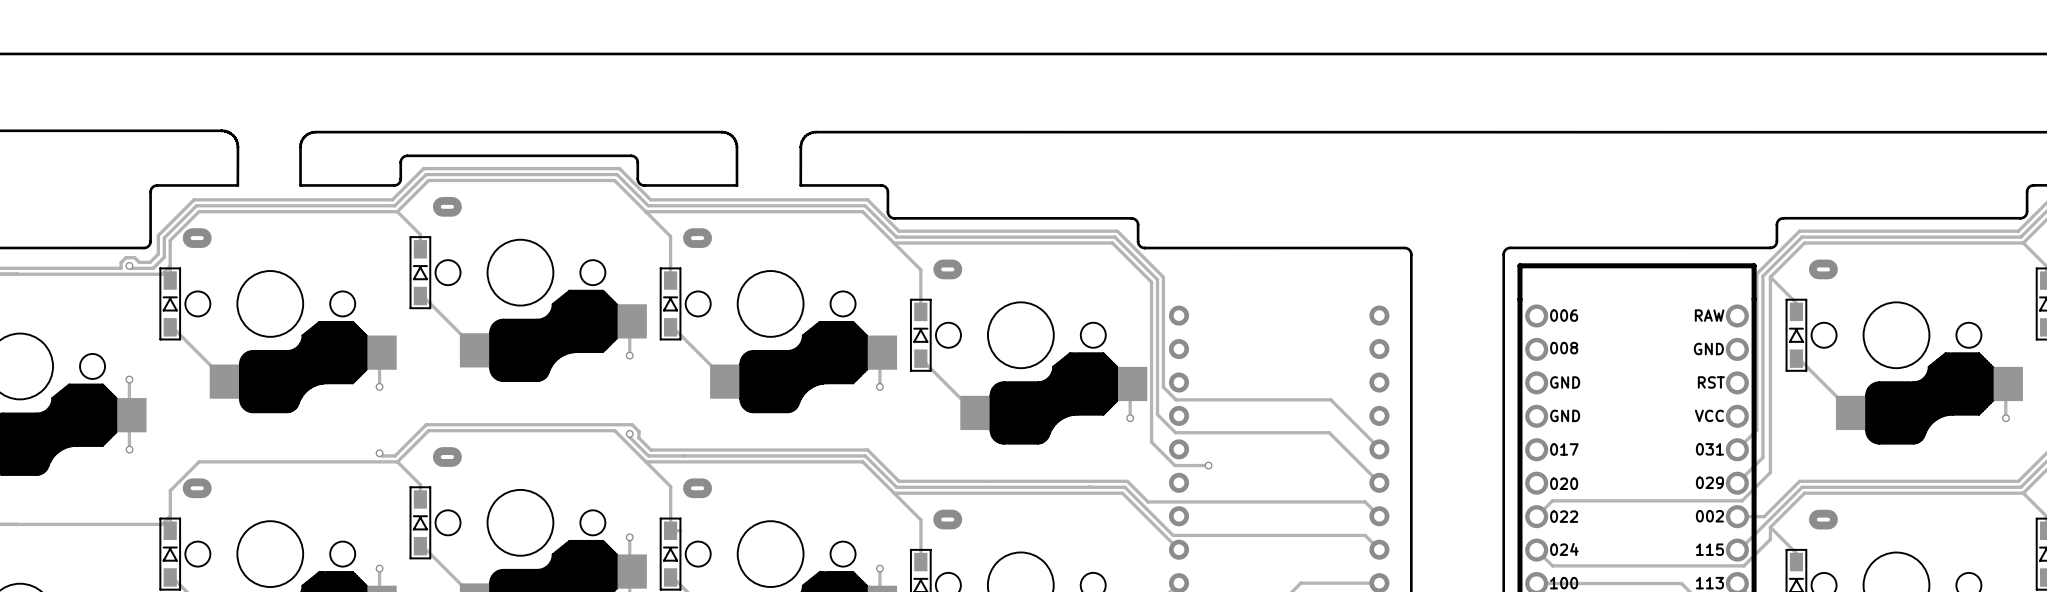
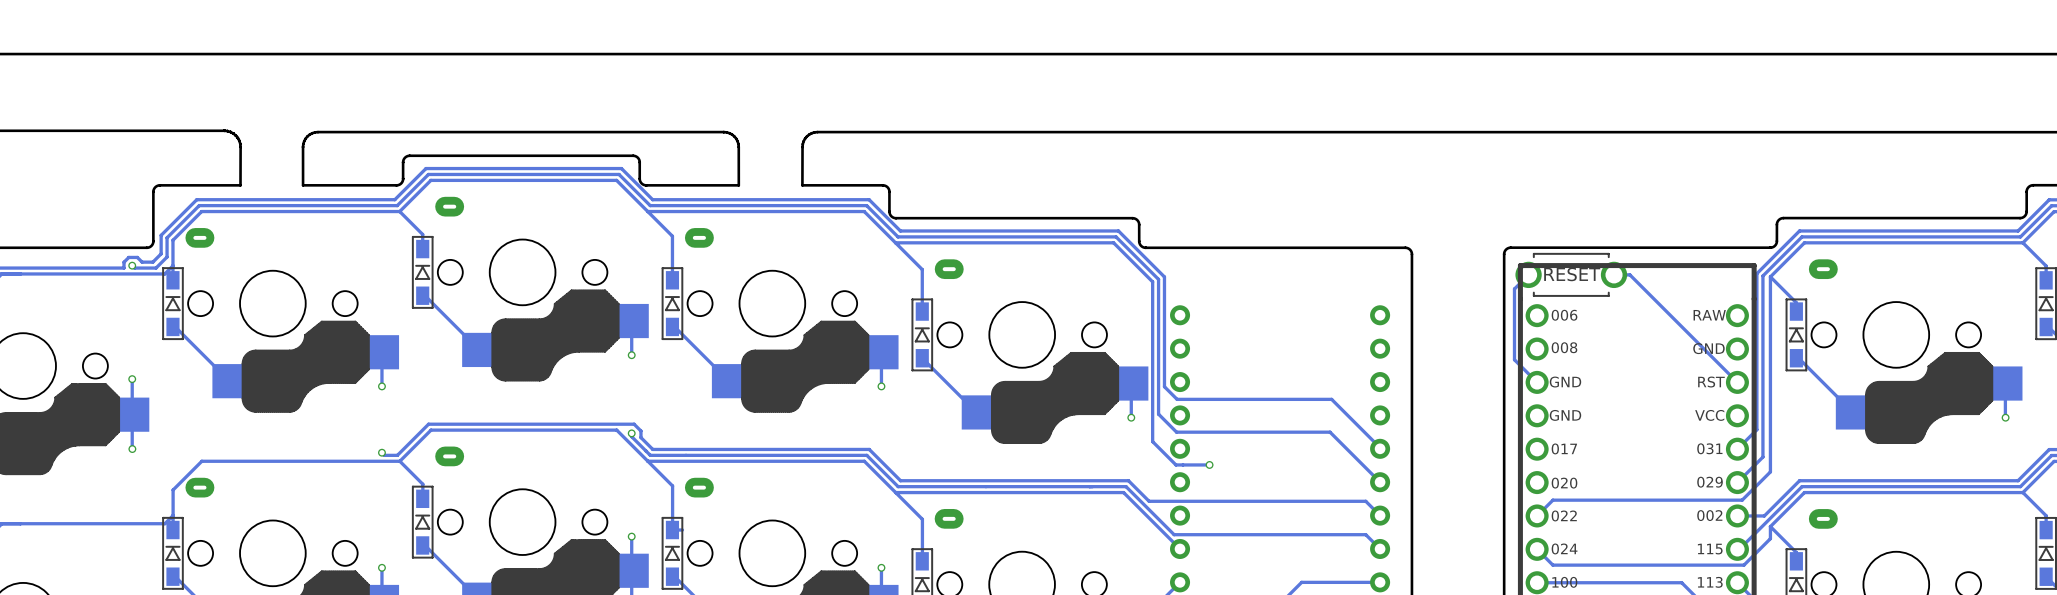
track: none -> (1528, 274) (1514, 288) (1514, 359) (1537, 382)
part: none -> (1571, 274)
track: none -> (1614, 274) (1629, 274) (1737, 382)

